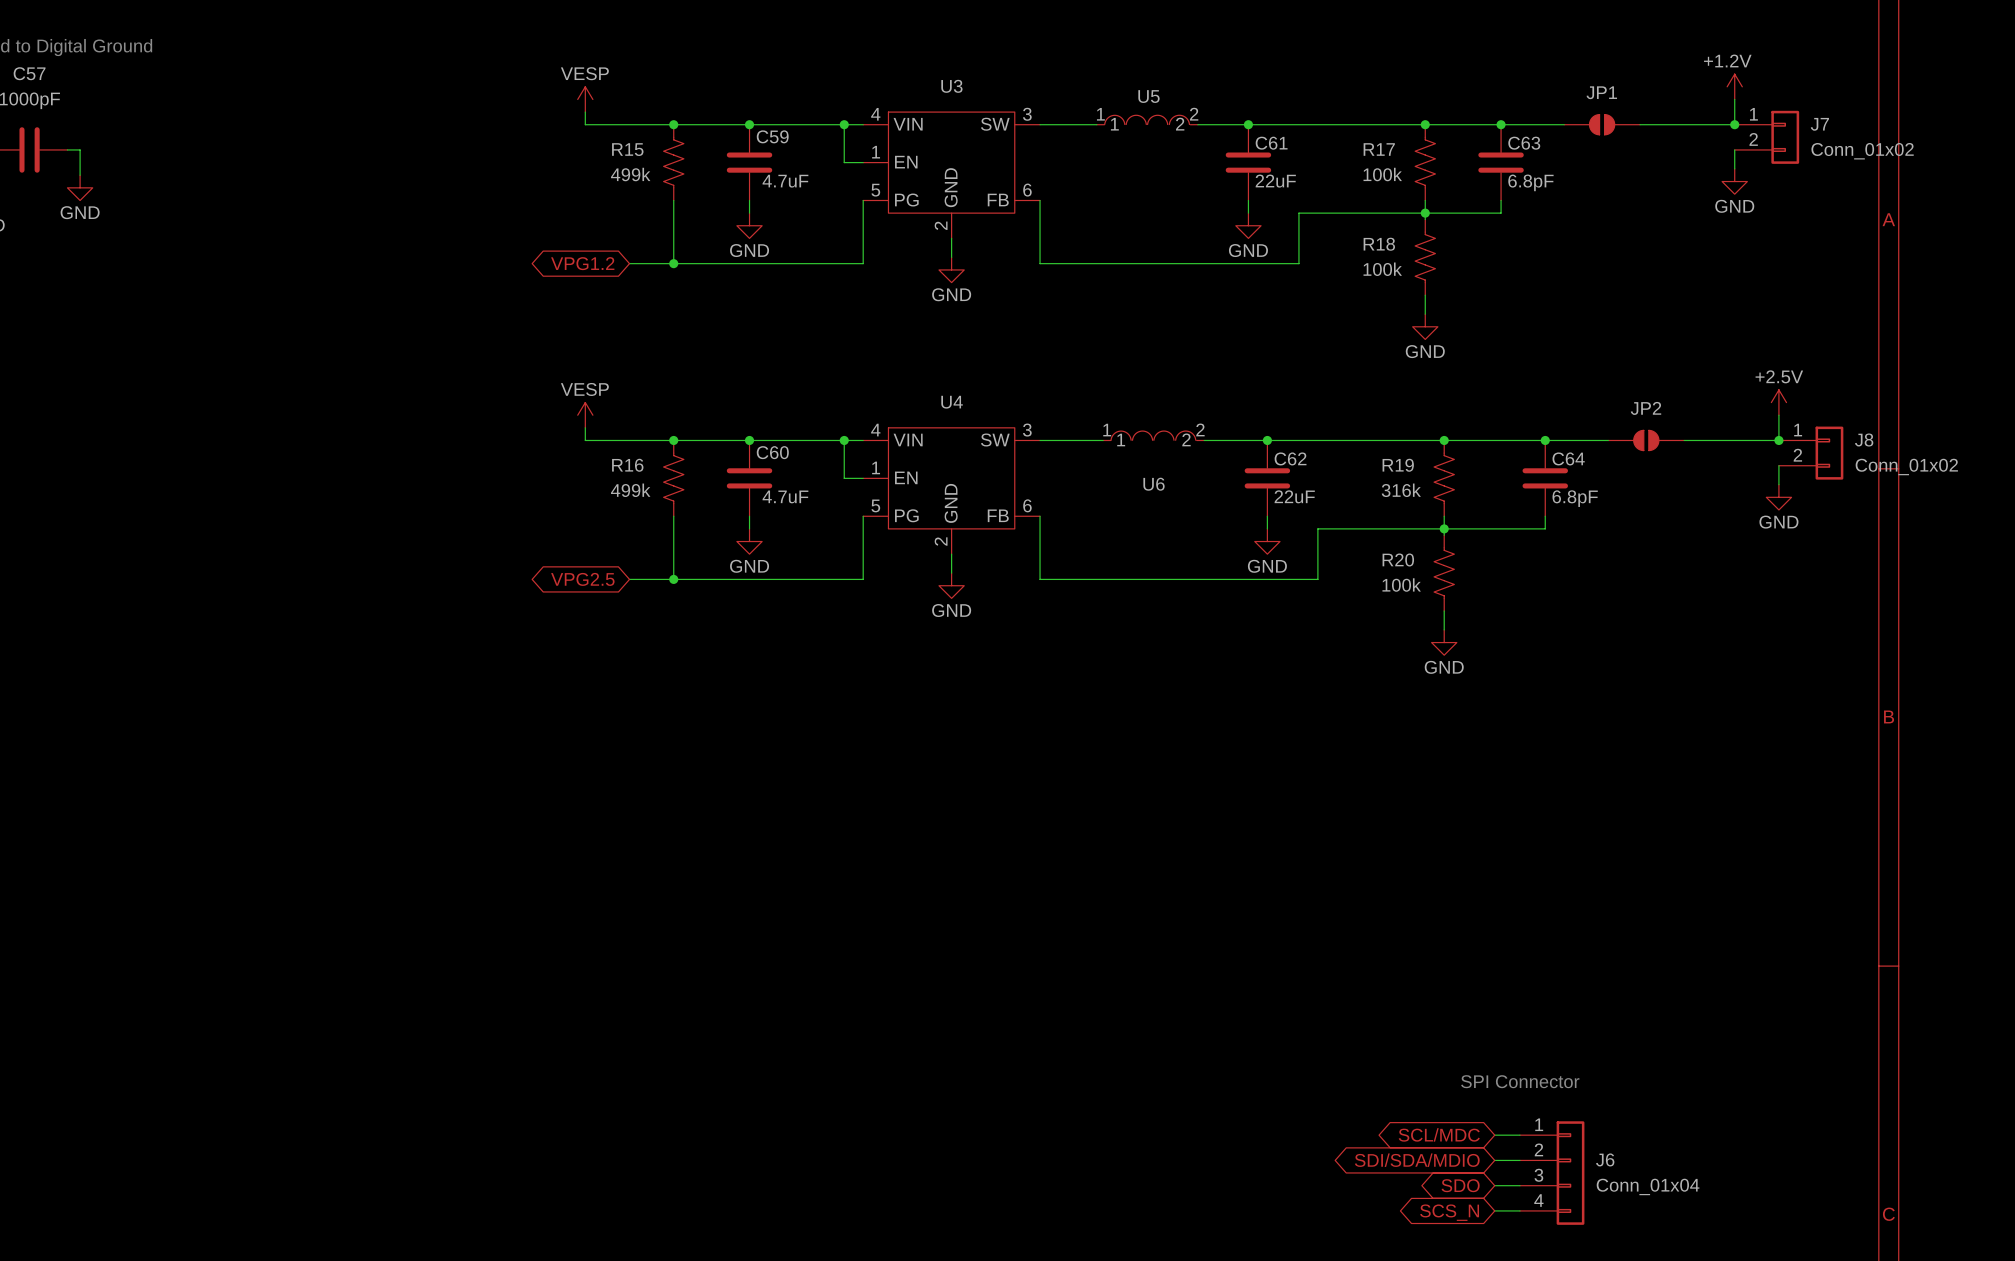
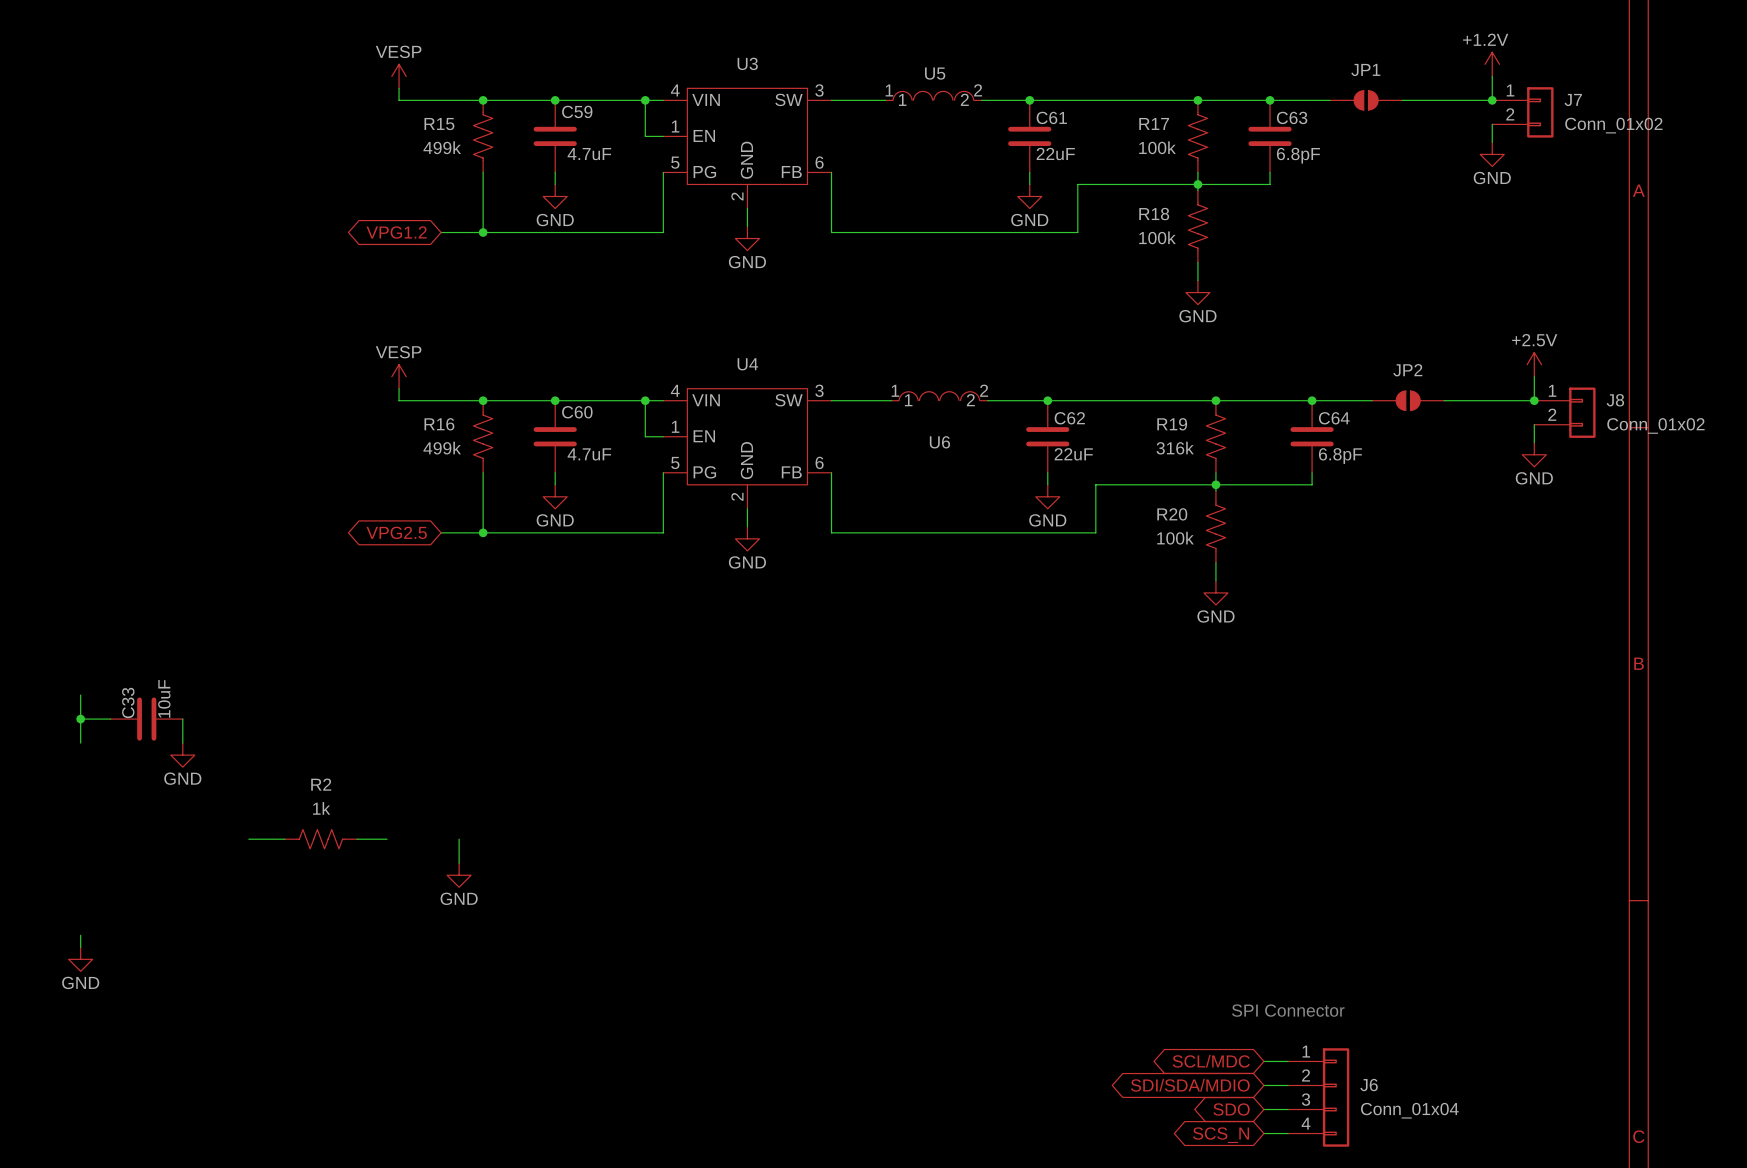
wire: none -> (80, 695) (80, 743)
wire: none -> (80, 719) (110, 719)
junction: none -> (80, 719)
C33: none -> 10uF (146, 719)
wire: none -> (182, 719) (182, 743)
power symbol: none -> GND (182, 755)
wire: none -> (248, 839) (284, 839)
R2: none -> 1k (320, 839)
wire: none -> (356, 839) (387, 839)
wire: none -> (459, 839) (459, 863)
power symbol: none -> GND (459, 875)
wire: none -> (80, 935) (80, 947)
power symbol: none -> GND (80, 959)

